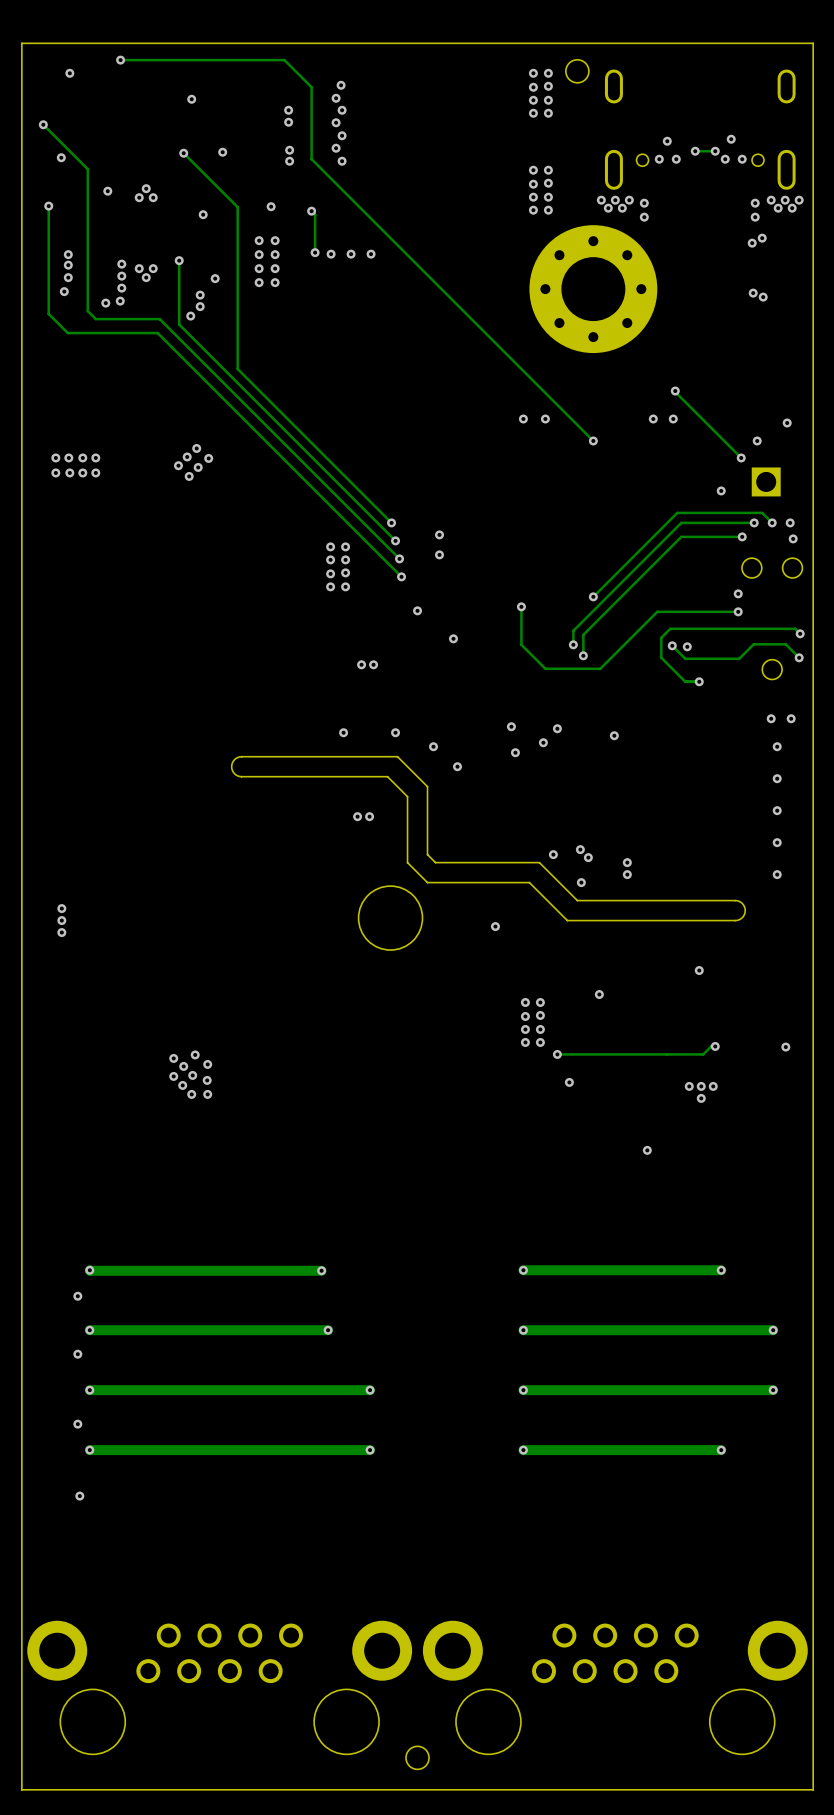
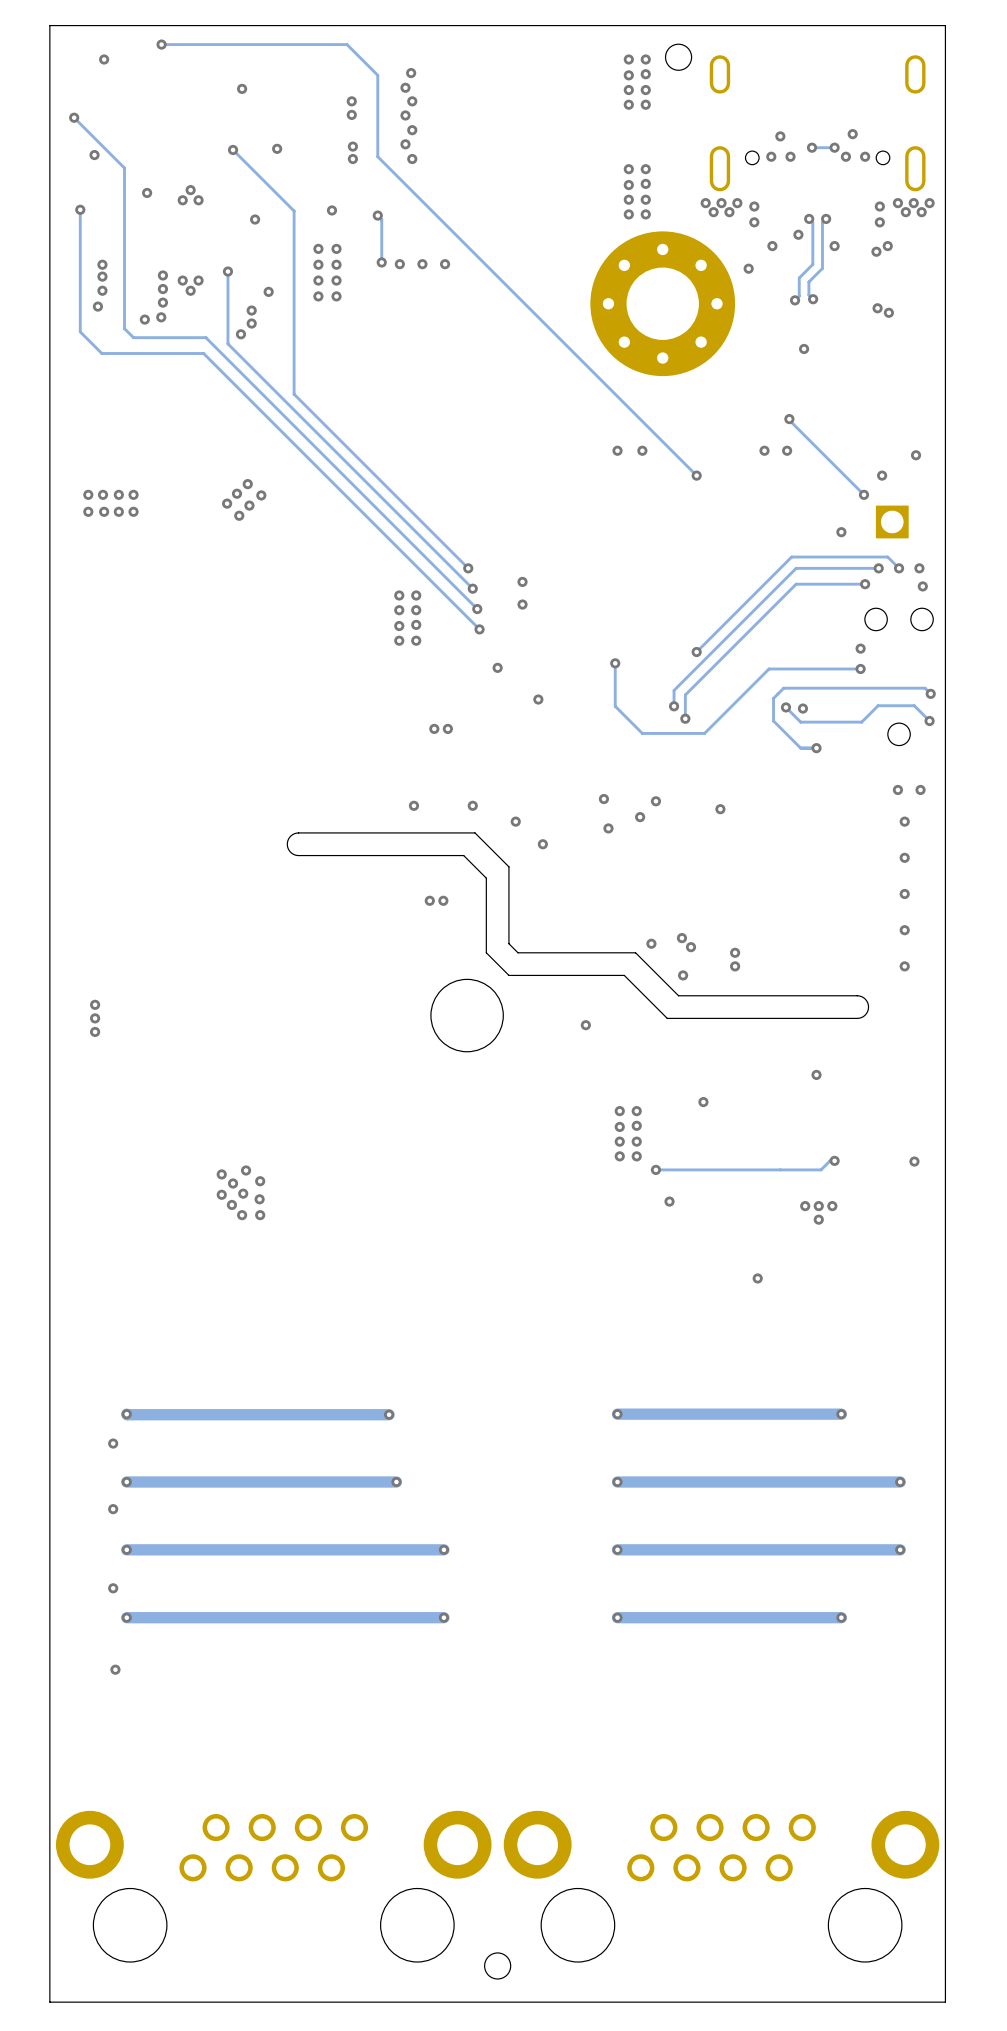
track: none -> (809, 218) (812, 222) (812, 264) (799, 278) (799, 296) (795, 300)
via: none -> (809, 218)
track: none -> (826, 218) (822, 222) (822, 268) (808, 282) (808, 295) (813, 299)
via: none -> (826, 218)
via: none -> (798, 234)
via: none -> (772, 246)
via: none -> (834, 246)
via: none -> (748, 268)
via: none -> (813, 299)
via: none -> (795, 300)
part position: (593, 289) -> (662, 303)
via: none -> (804, 348)

